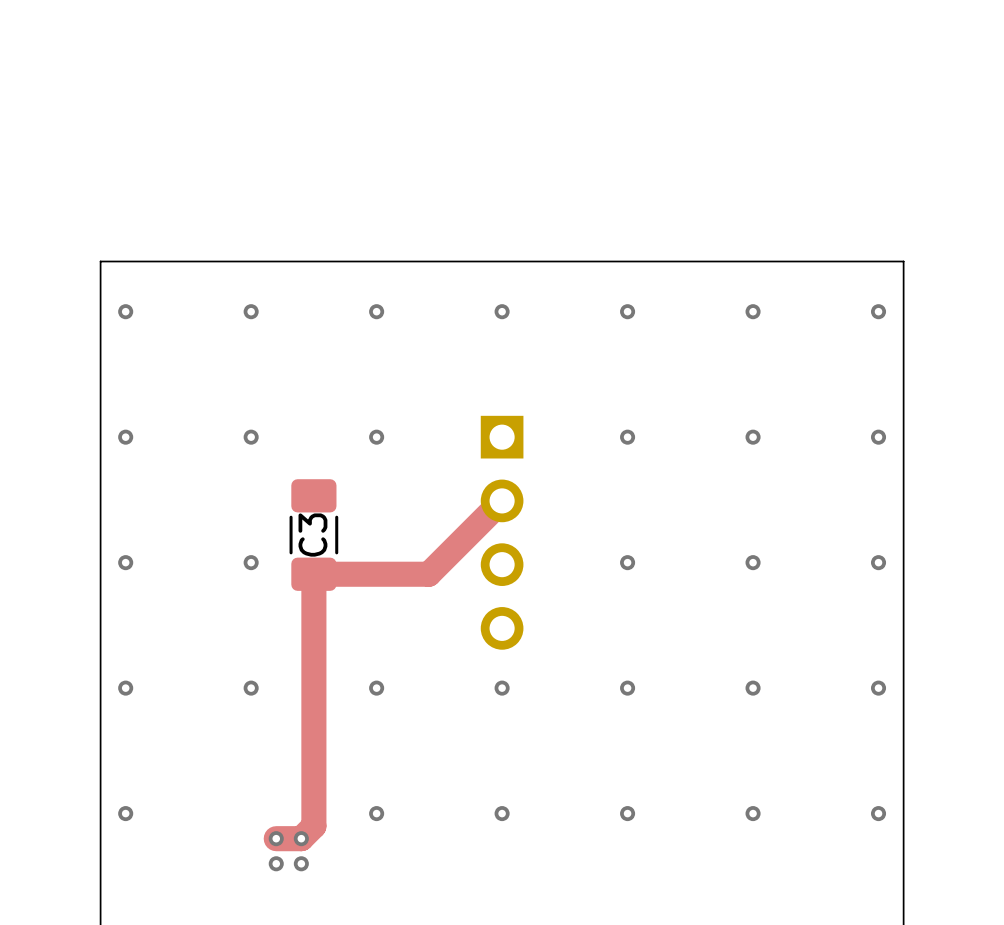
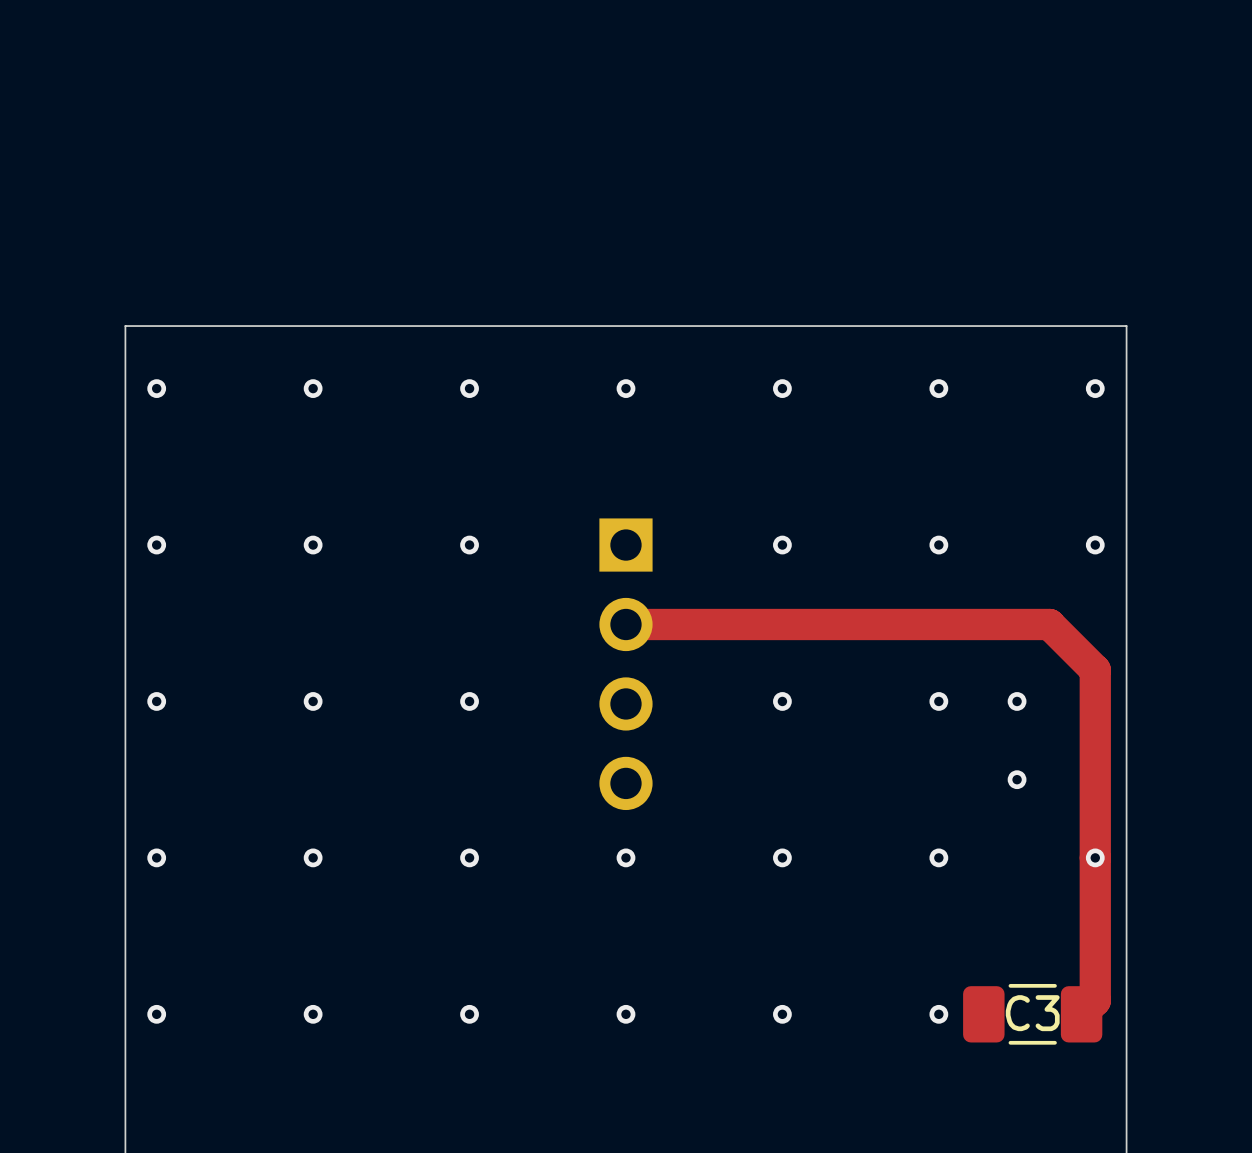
track: (502, 500) (428, 574) (313, 574) (313, 826) (301, 838) (276, 838) -> (625, 624) (1049, 624) (1095, 670) (1095, 1000) (1081, 1014)
C3 rotation: 0° (313, 535) -> 90° clockwise (1032, 1014)
C3 position: (313, 535) -> (1032, 1014)
via: none -> (469, 701)
via: none -> (1017, 701)
via: (878, 562) -> none
via: none -> (1017, 779)
via: none -> (313, 1014)
via: (878, 813) -> none
via: (276, 838) -> none
via: (301, 838) -> none
via: (276, 863) -> none
via: (301, 863) -> none

